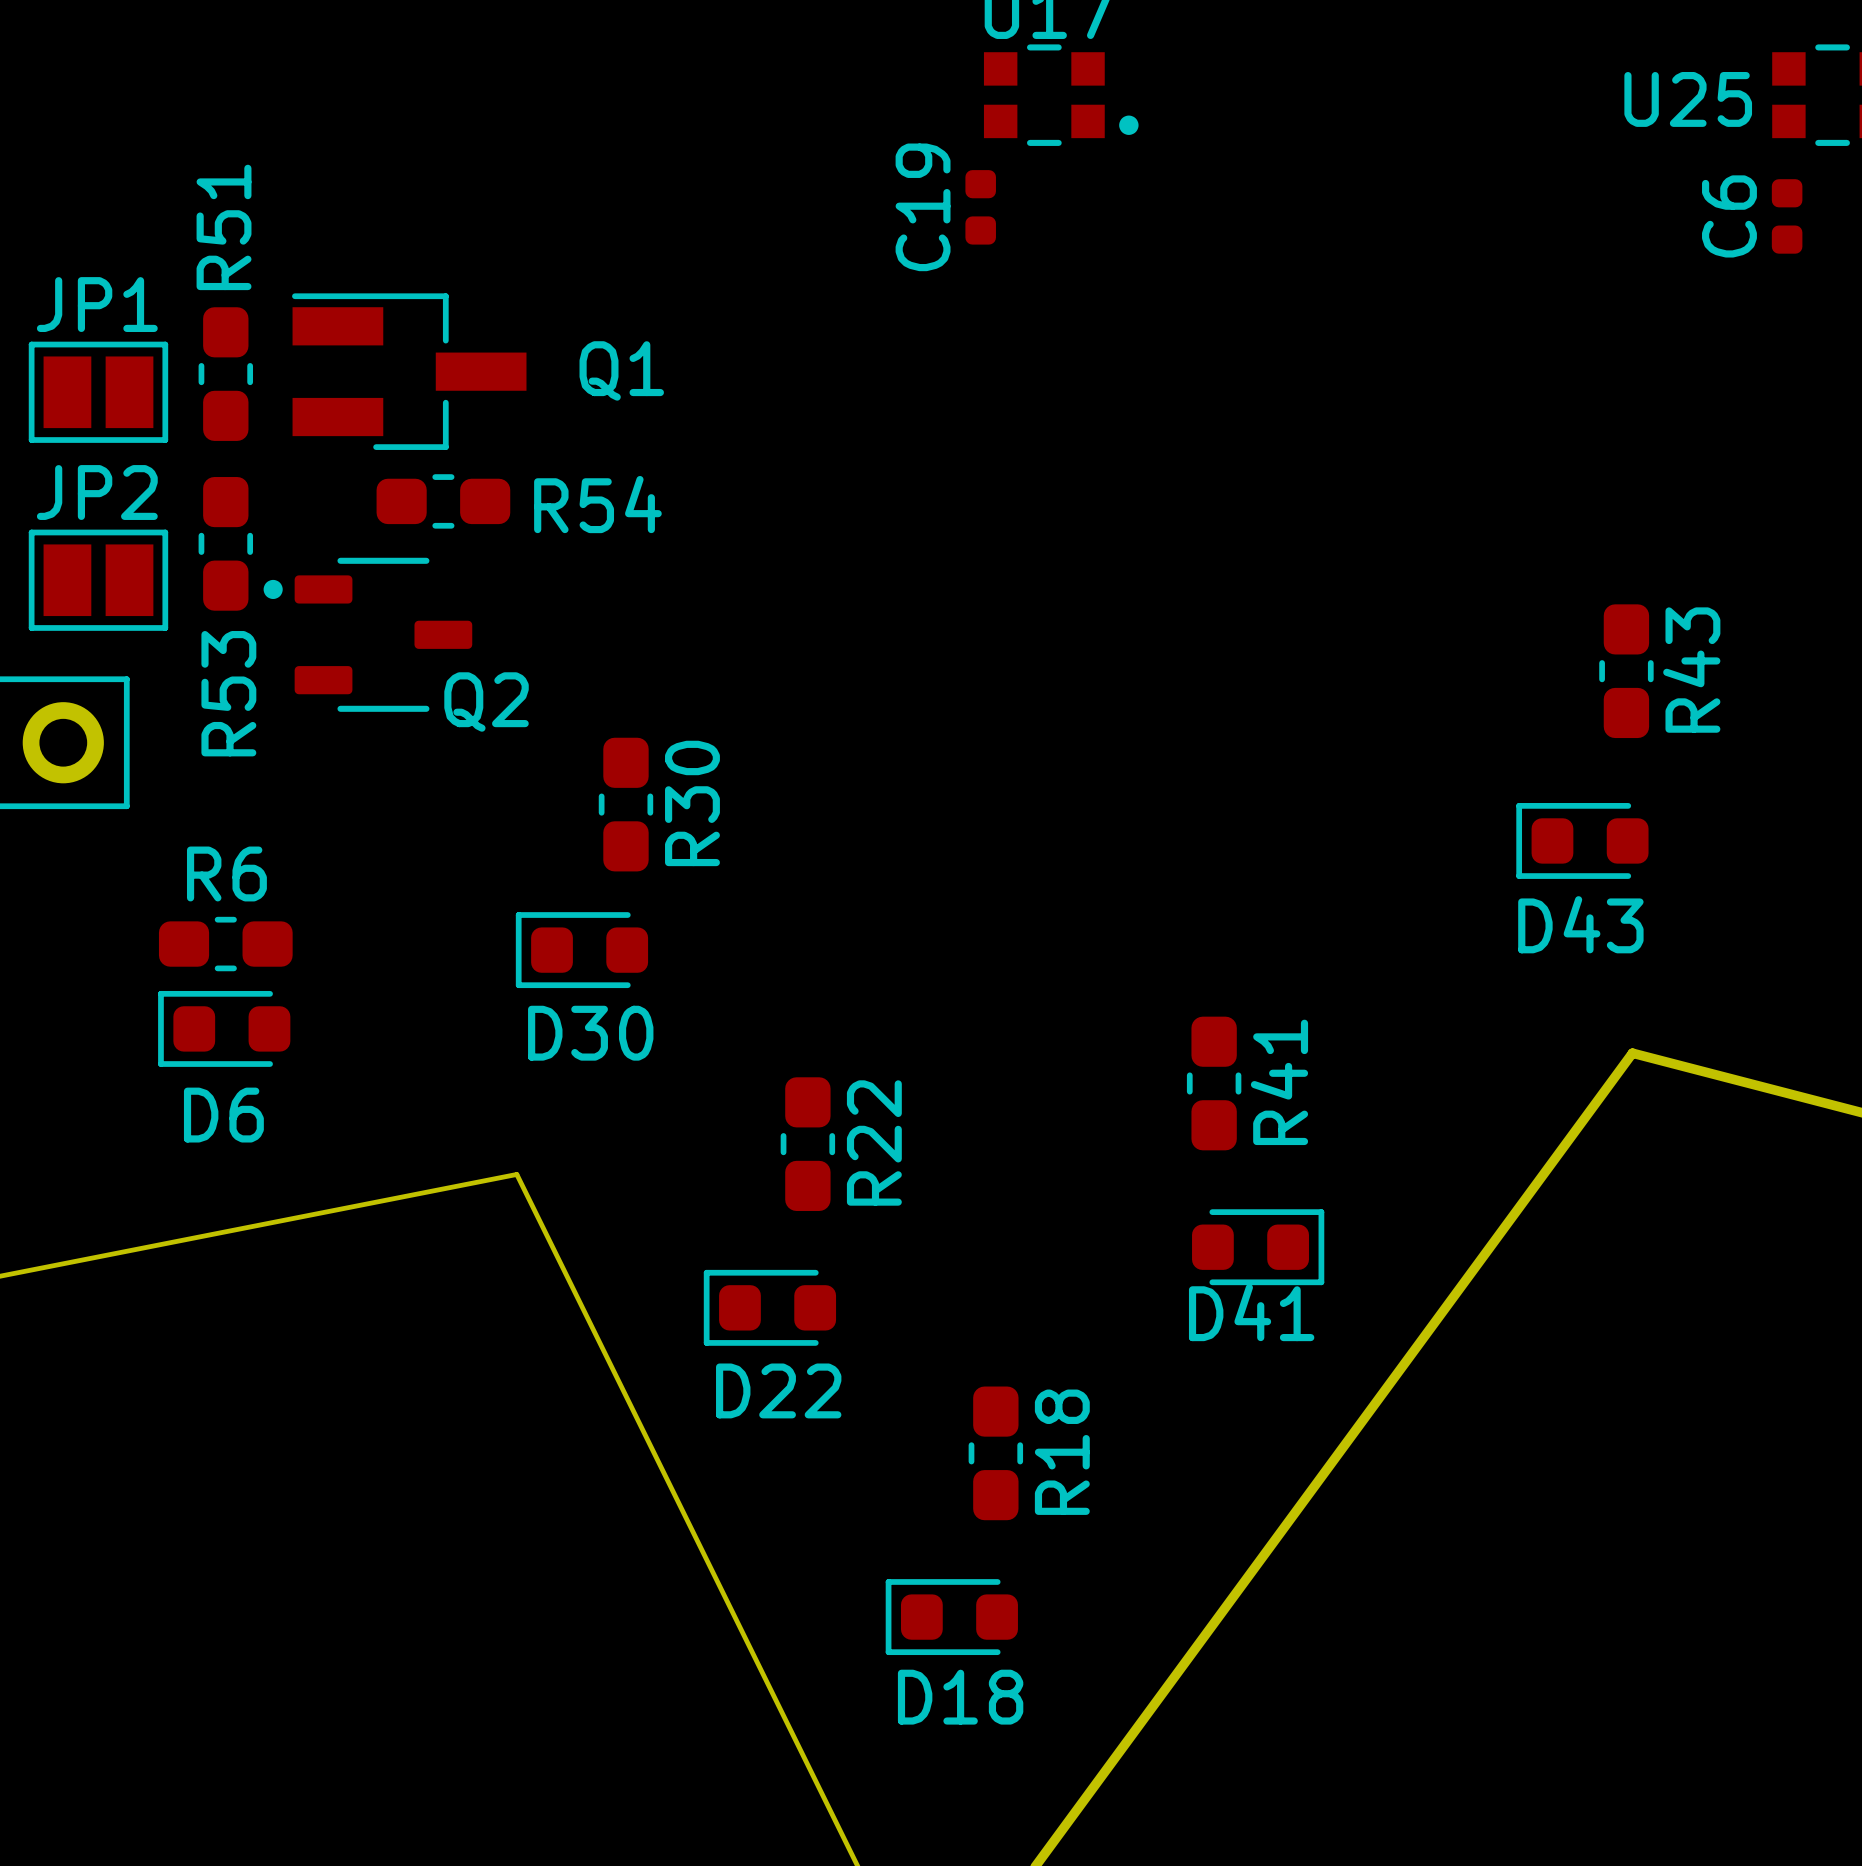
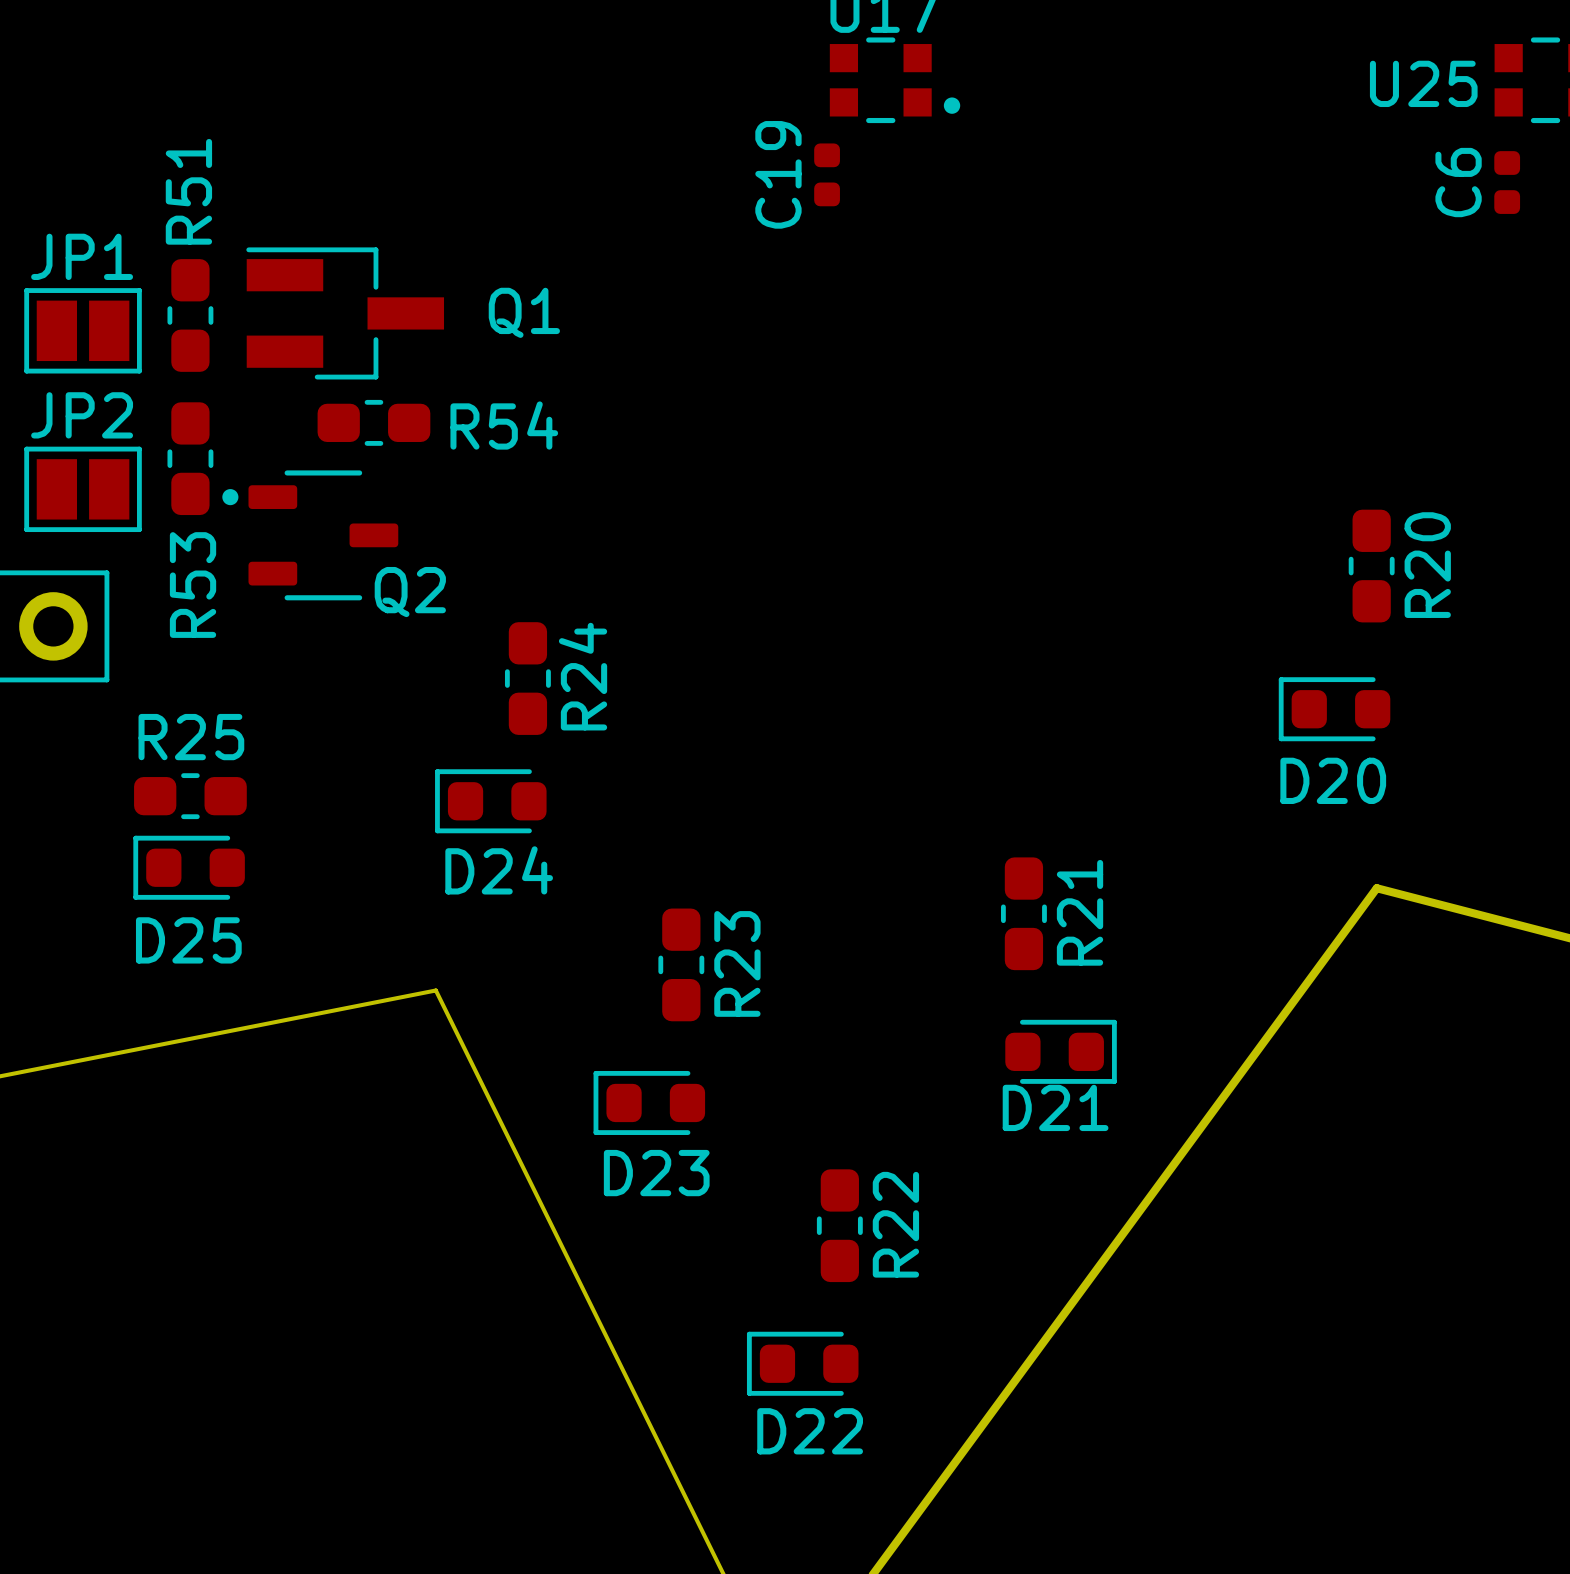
R43 name: R43 (1691, 670) -> R20 (1427, 565)
R30 name: R30 (692, 803) -> R24 (583, 676)
R6 name: R6 (226, 873) -> R25 (191, 737)
D43 name: D43 (1580, 924) -> D20 (1333, 780)
D30 name: D30 (590, 1033) -> D24 (499, 870)
R41 name: R41 (1279, 1082) -> R21 (1080, 912)
D6 name: D6 (223, 1115) -> D25 (188, 940)
R22 name: R22 (874, 1142) -> R23 (737, 963)
D41 name: D41 (1251, 1312) -> D21 (1055, 1107)
D22 name: D22 (778, 1390) -> D23 (656, 1173)
R18 name: R18 (1062, 1452) -> R22 (895, 1224)
D18 name: D18 (960, 1697) -> D22 (810, 1431)

